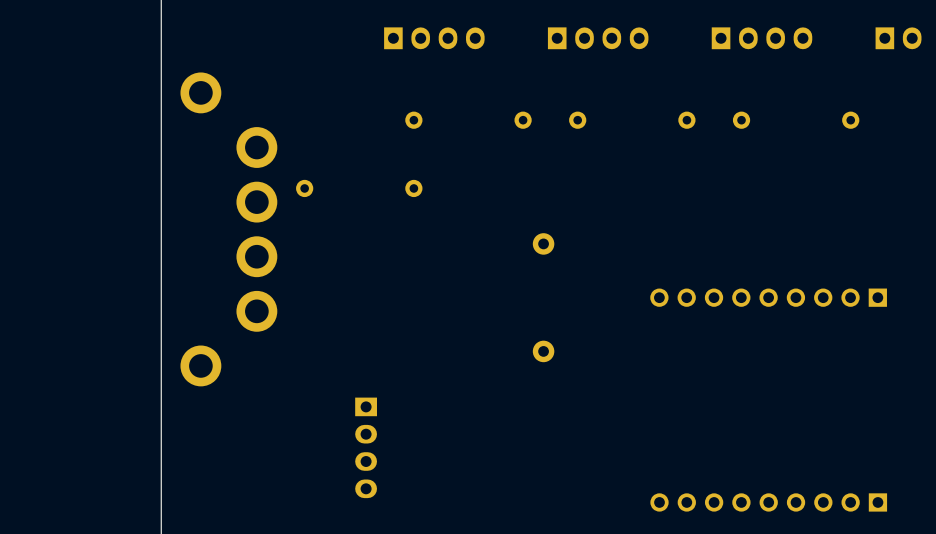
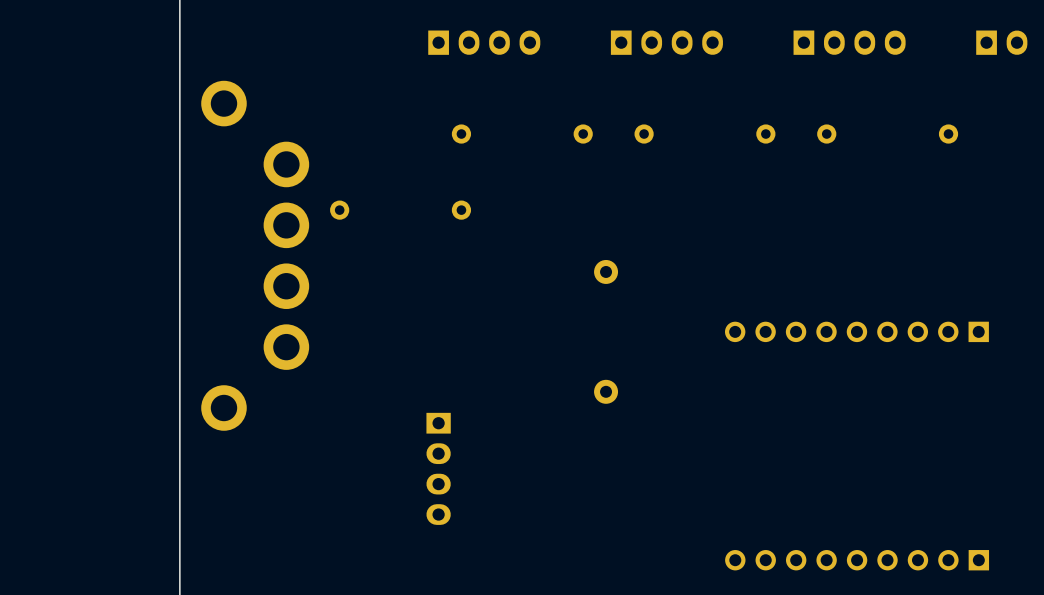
part position: (366, 447) -> (438, 468)

